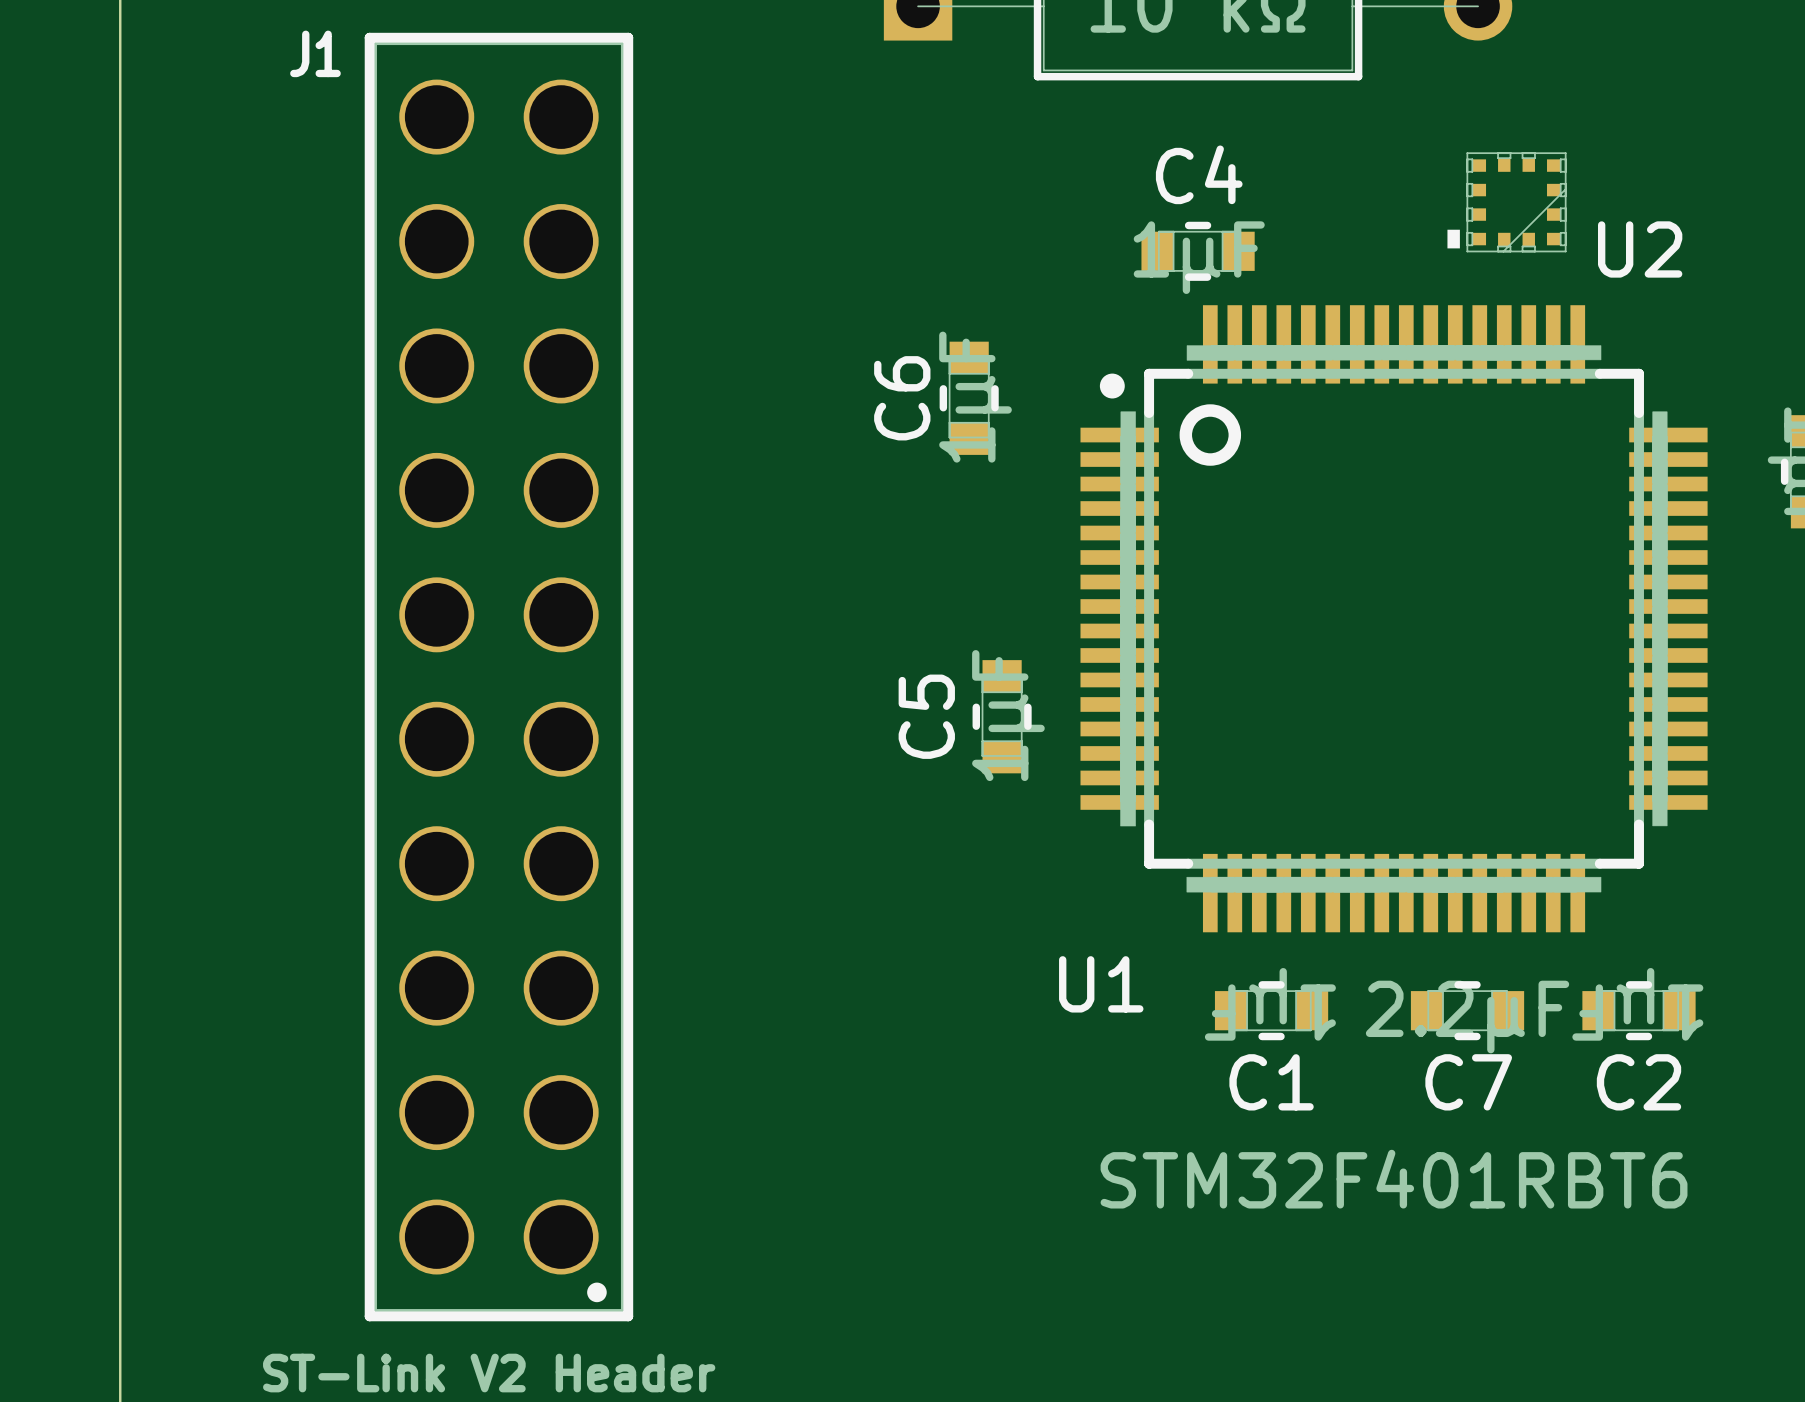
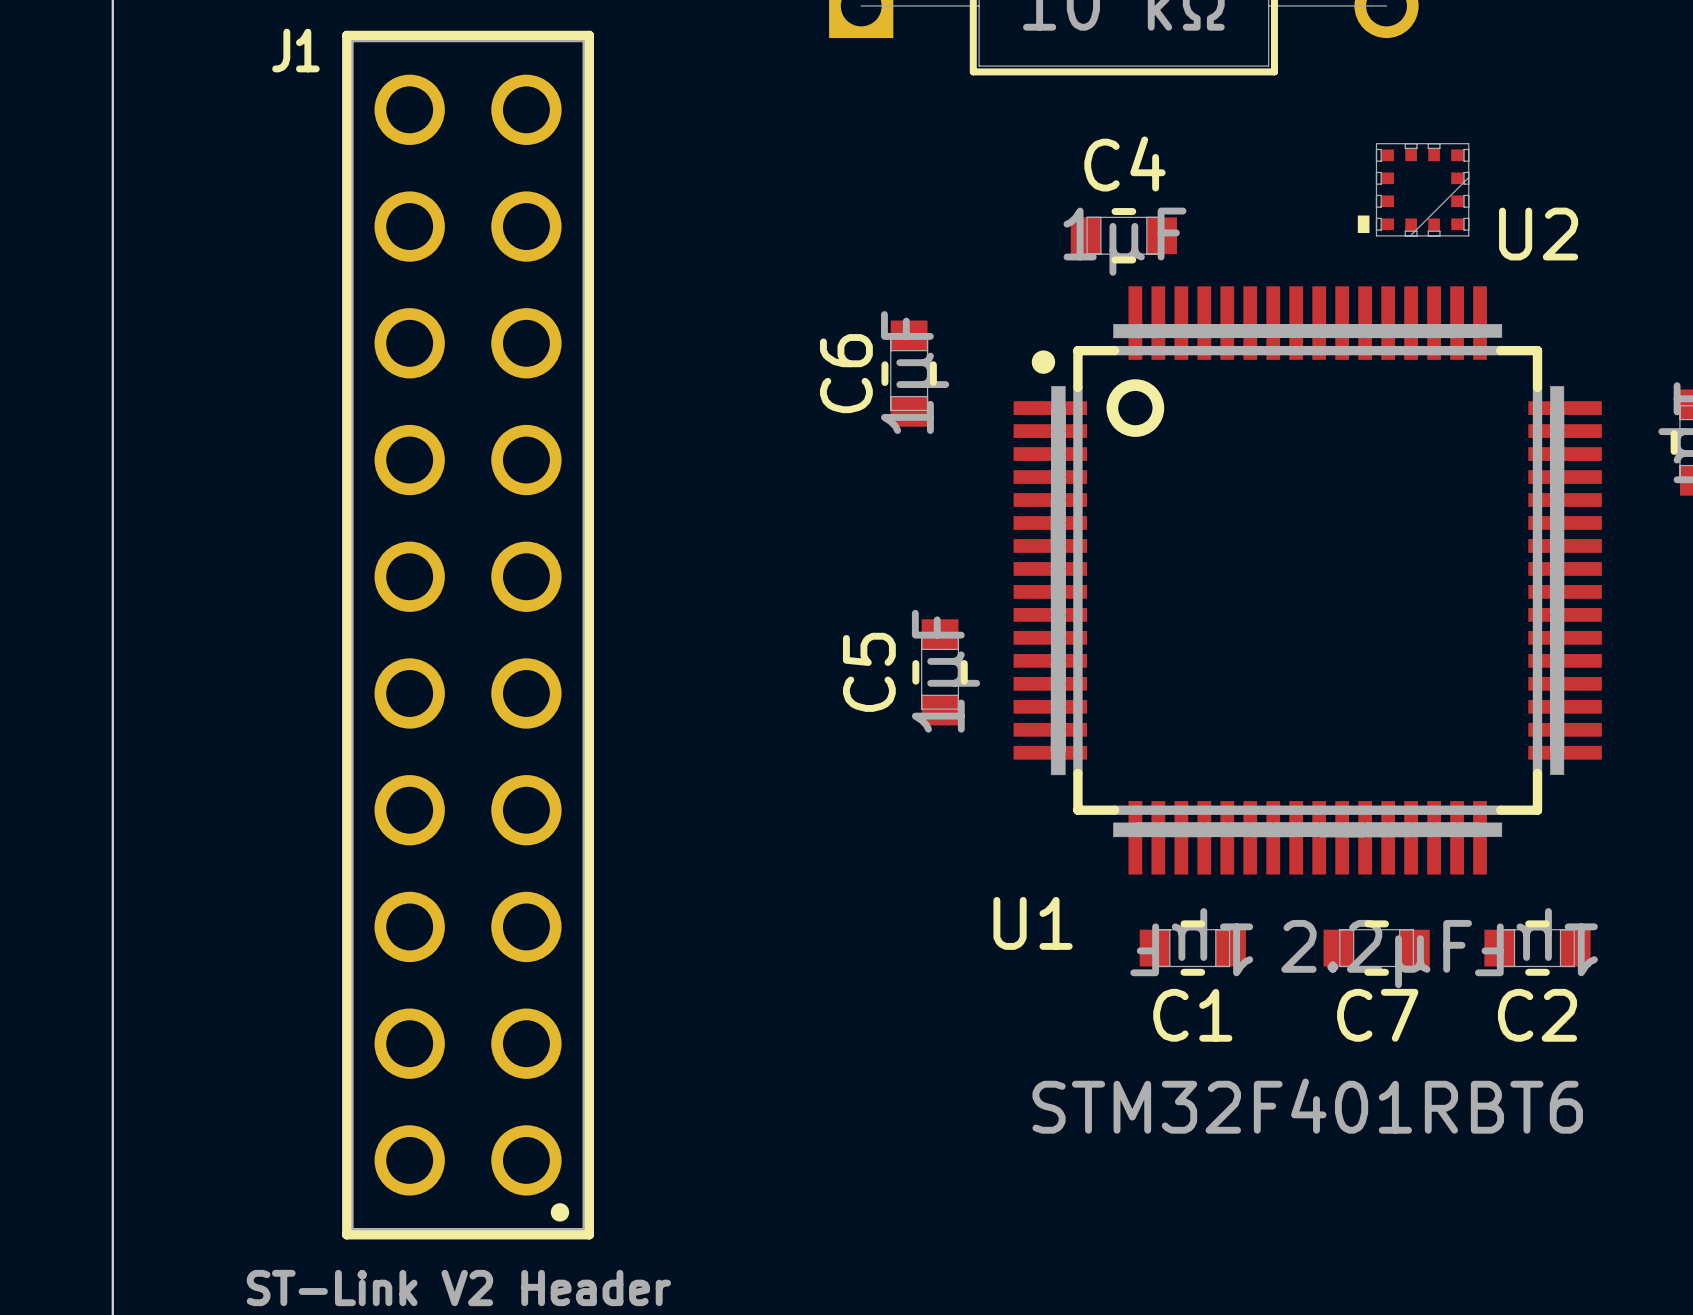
J1 footprint: [364, 32, 634, 1322] -> [342, 30, 594, 1240]

